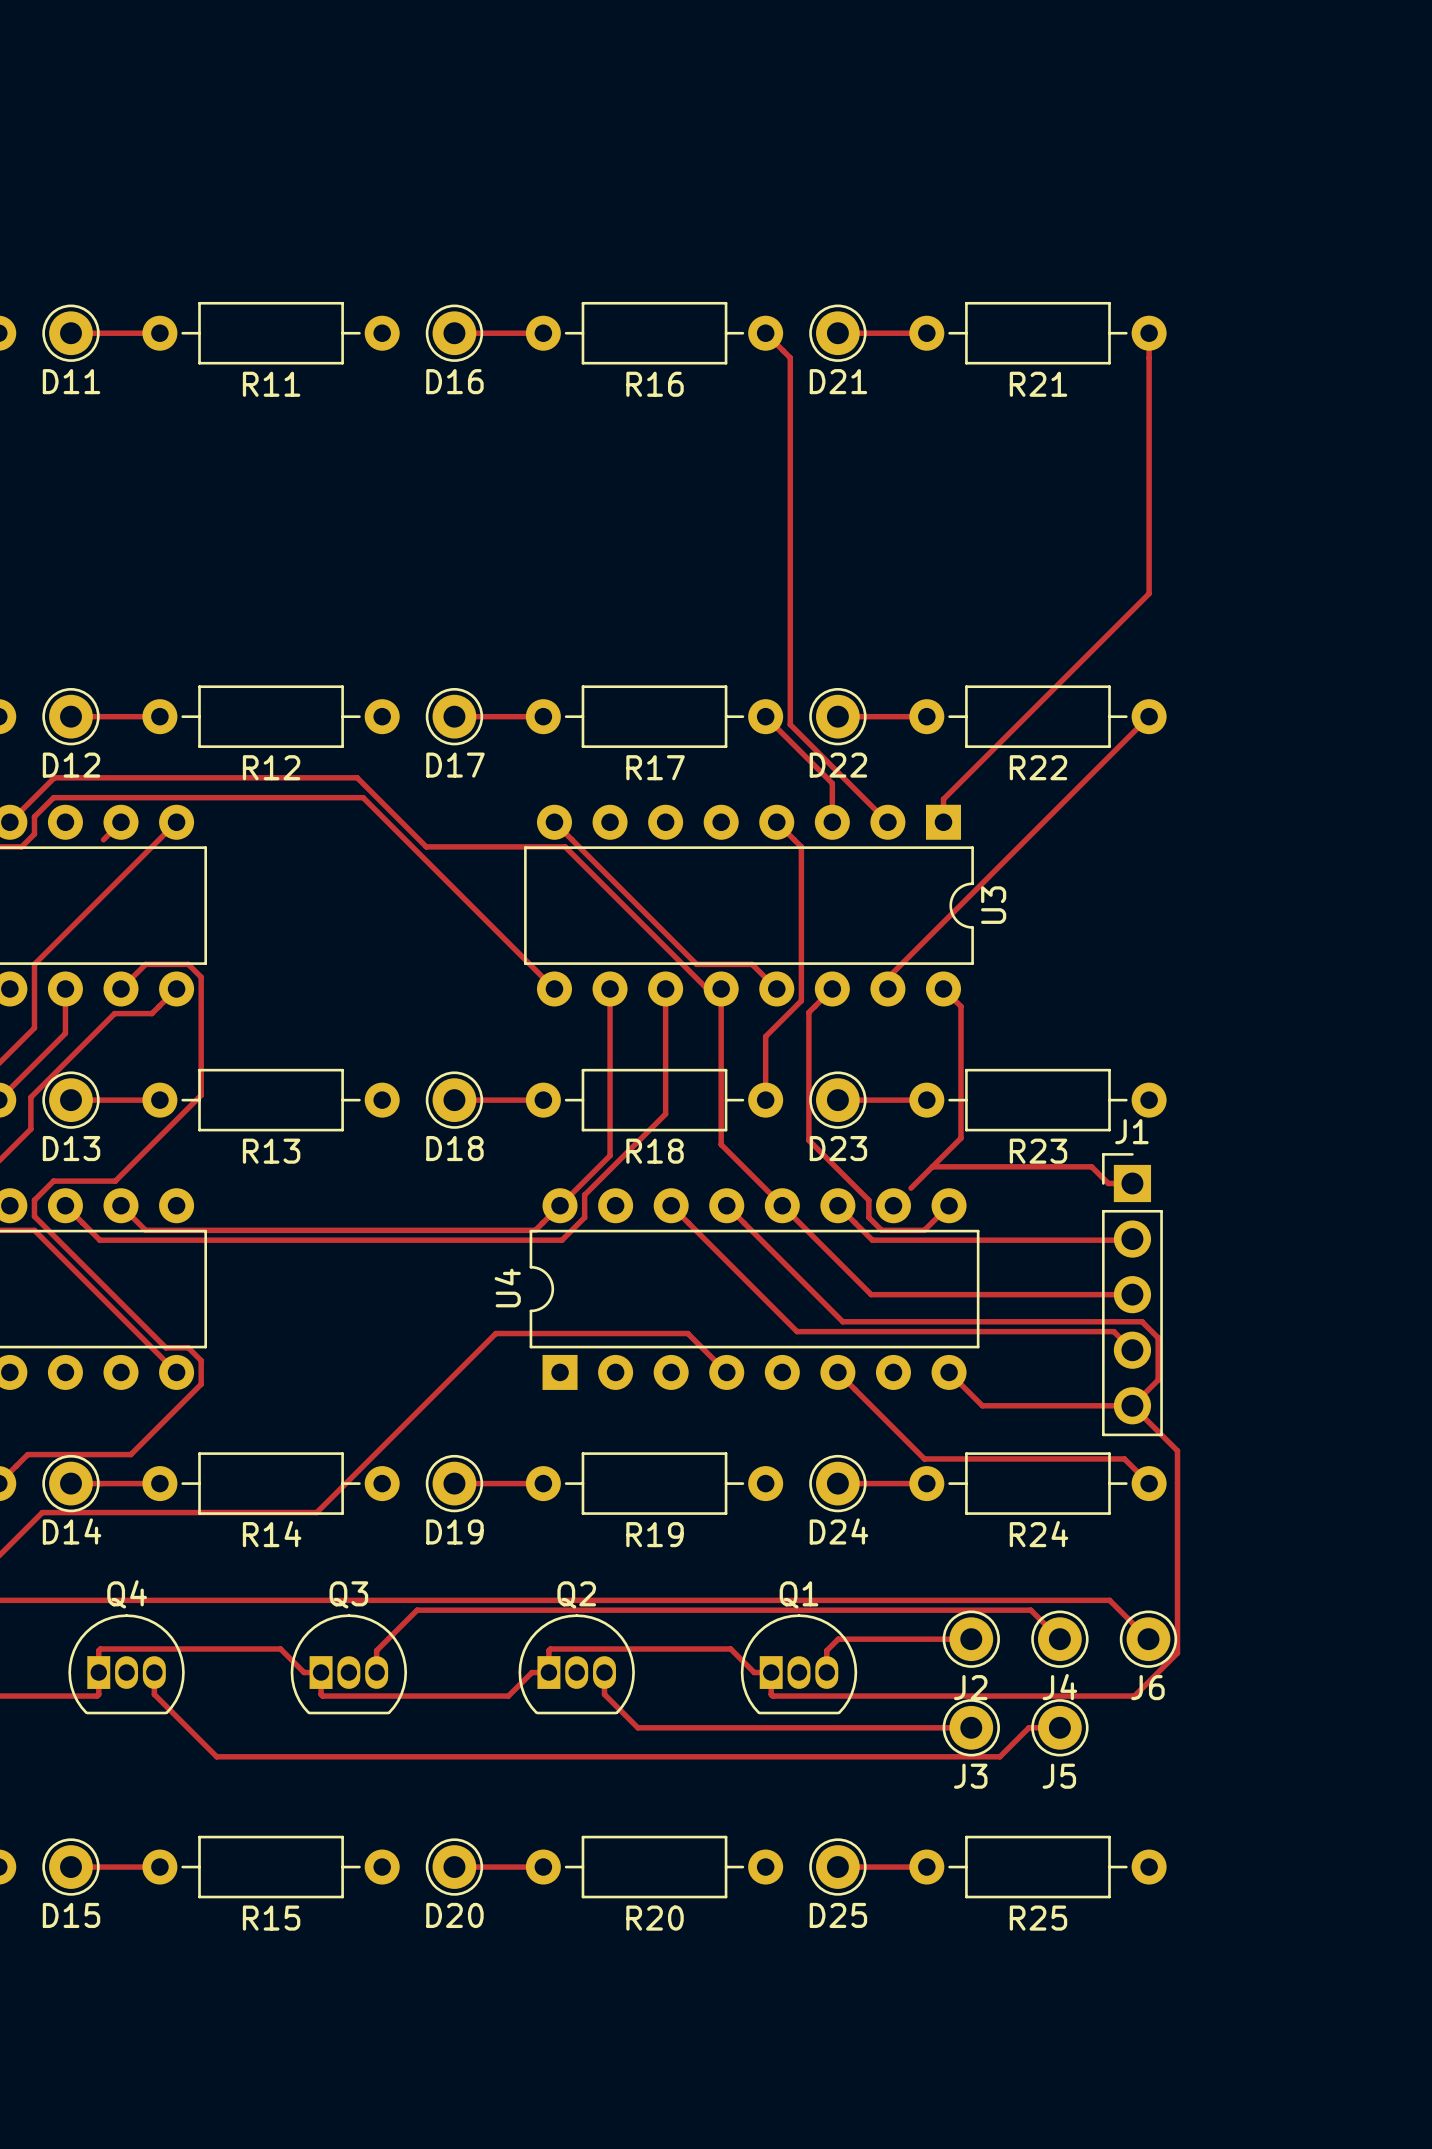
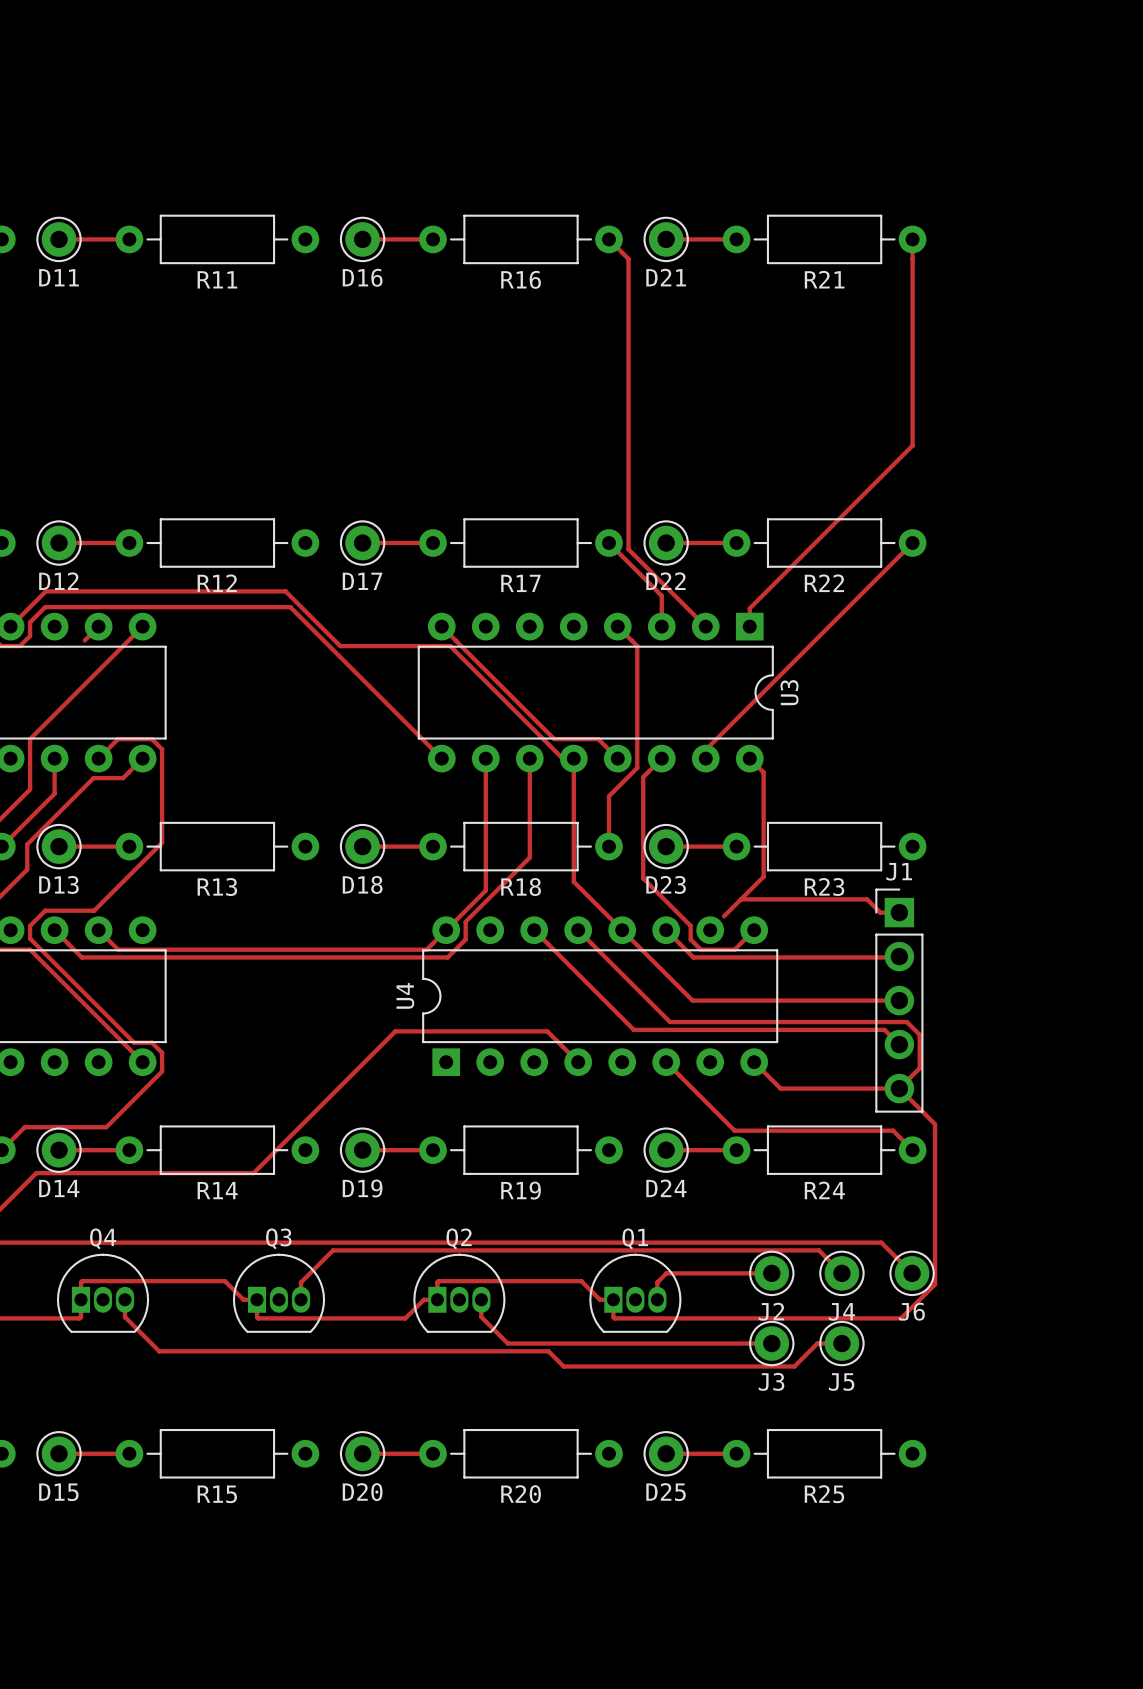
track: (197, 1737) (216, 1756) (708, 1756) -> (159, 1351) (548, 1351) (563, 1366)

